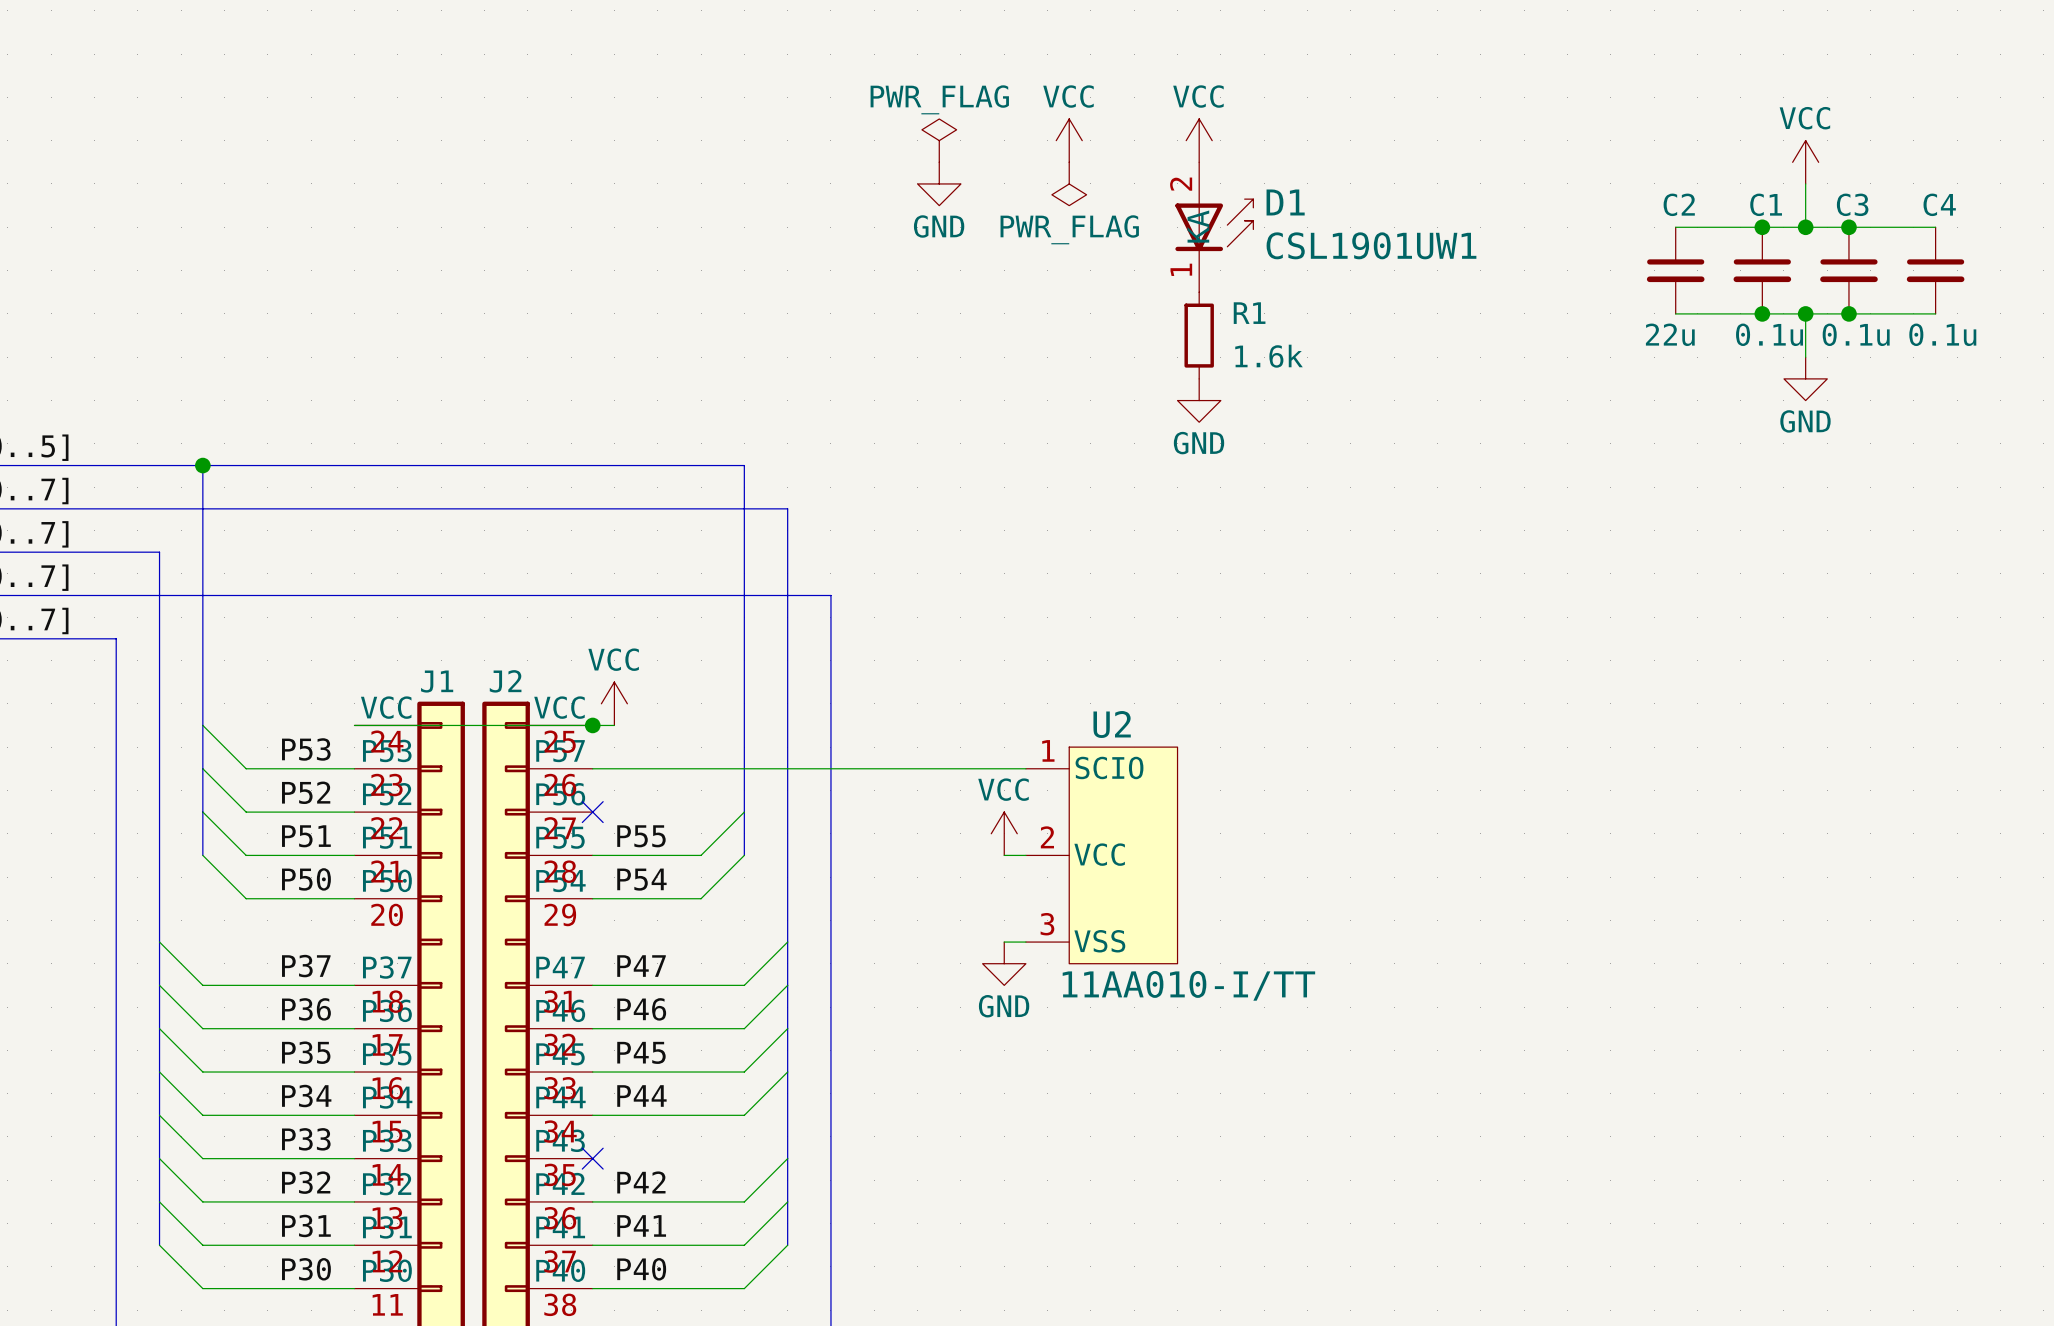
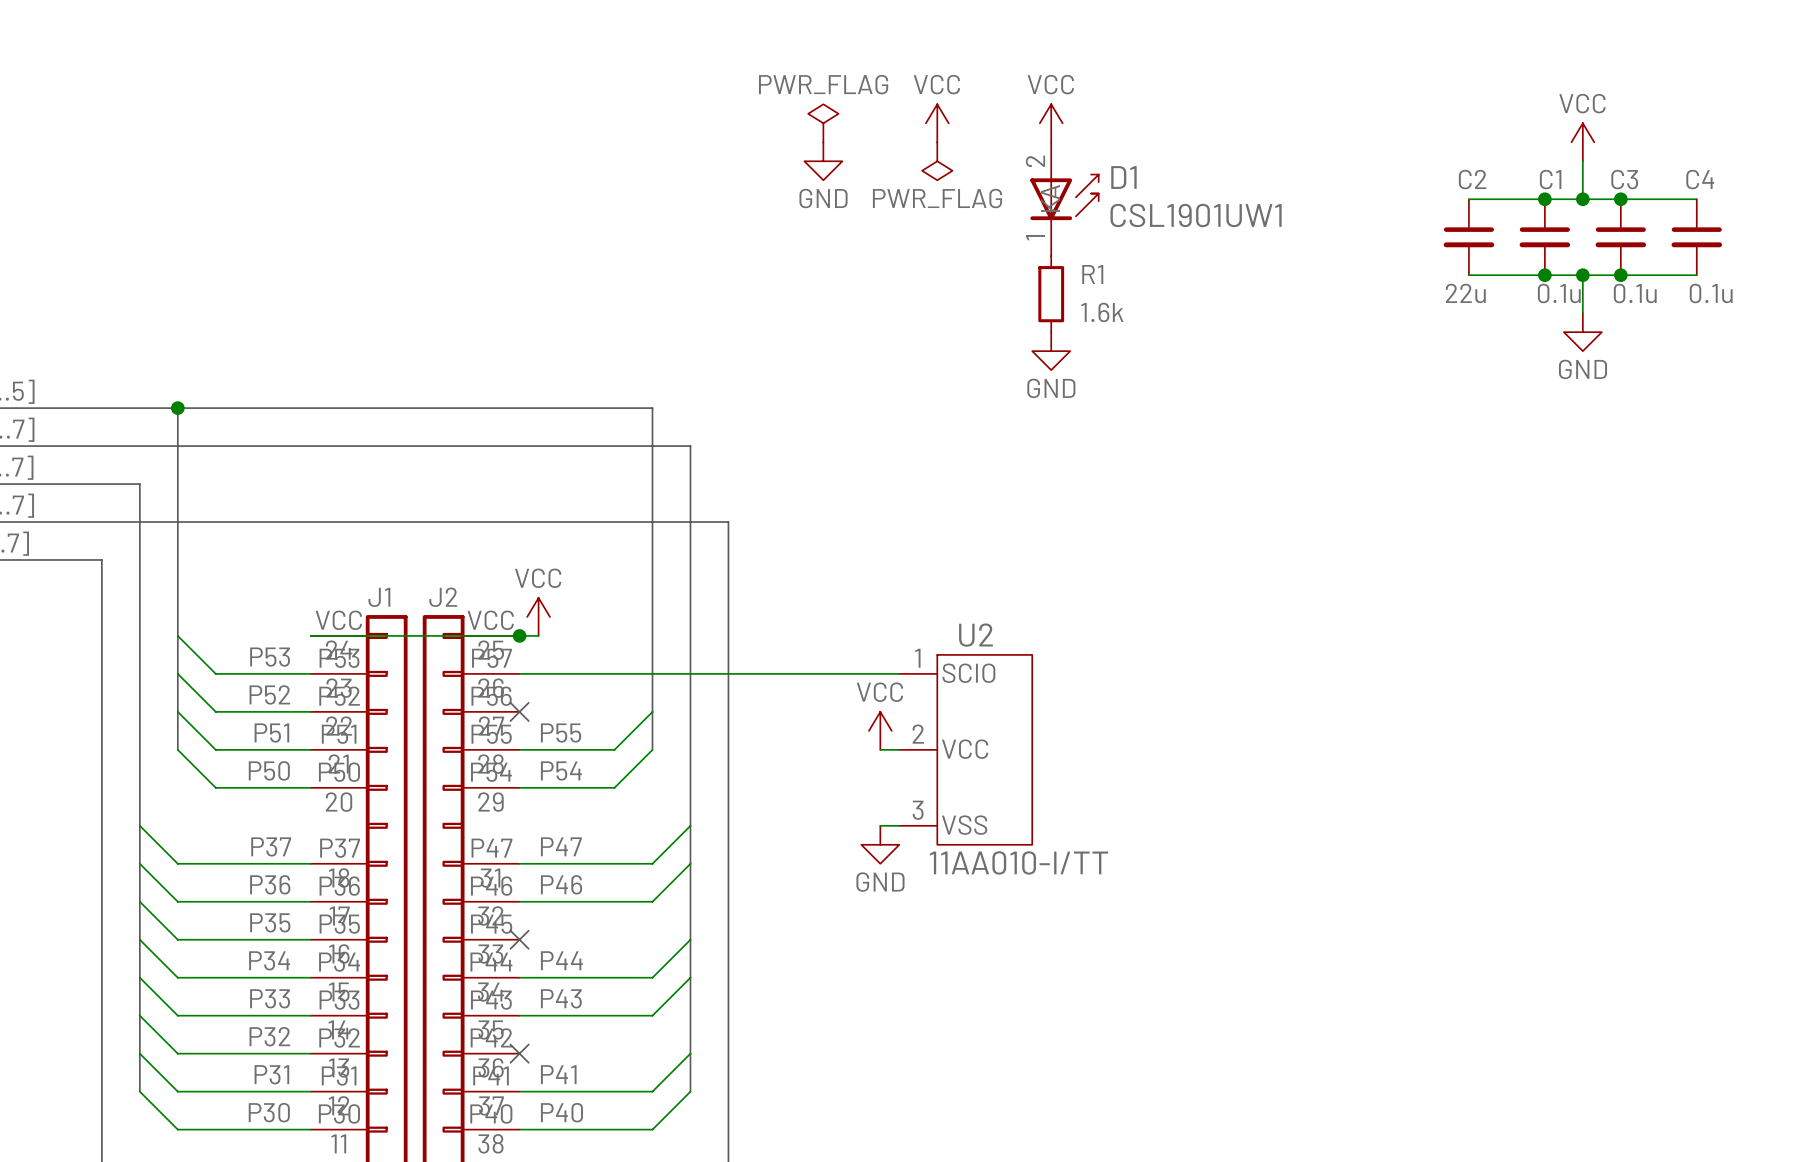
wire: (787, 1028) (744, 1072) (592, 1072) -> none
label: P45 (641, 1052) -> none
no-connect mark: none -> (519, 939)
no-connect mark: (592, 1158) -> none
wire: (787, 1158) (744, 1201) (592, 1201) -> (690, 977) (652, 1015) (519, 1015)
label: P42 (641, 1182) -> P43 (561, 998)
no-connect mark: none -> (519, 1053)

